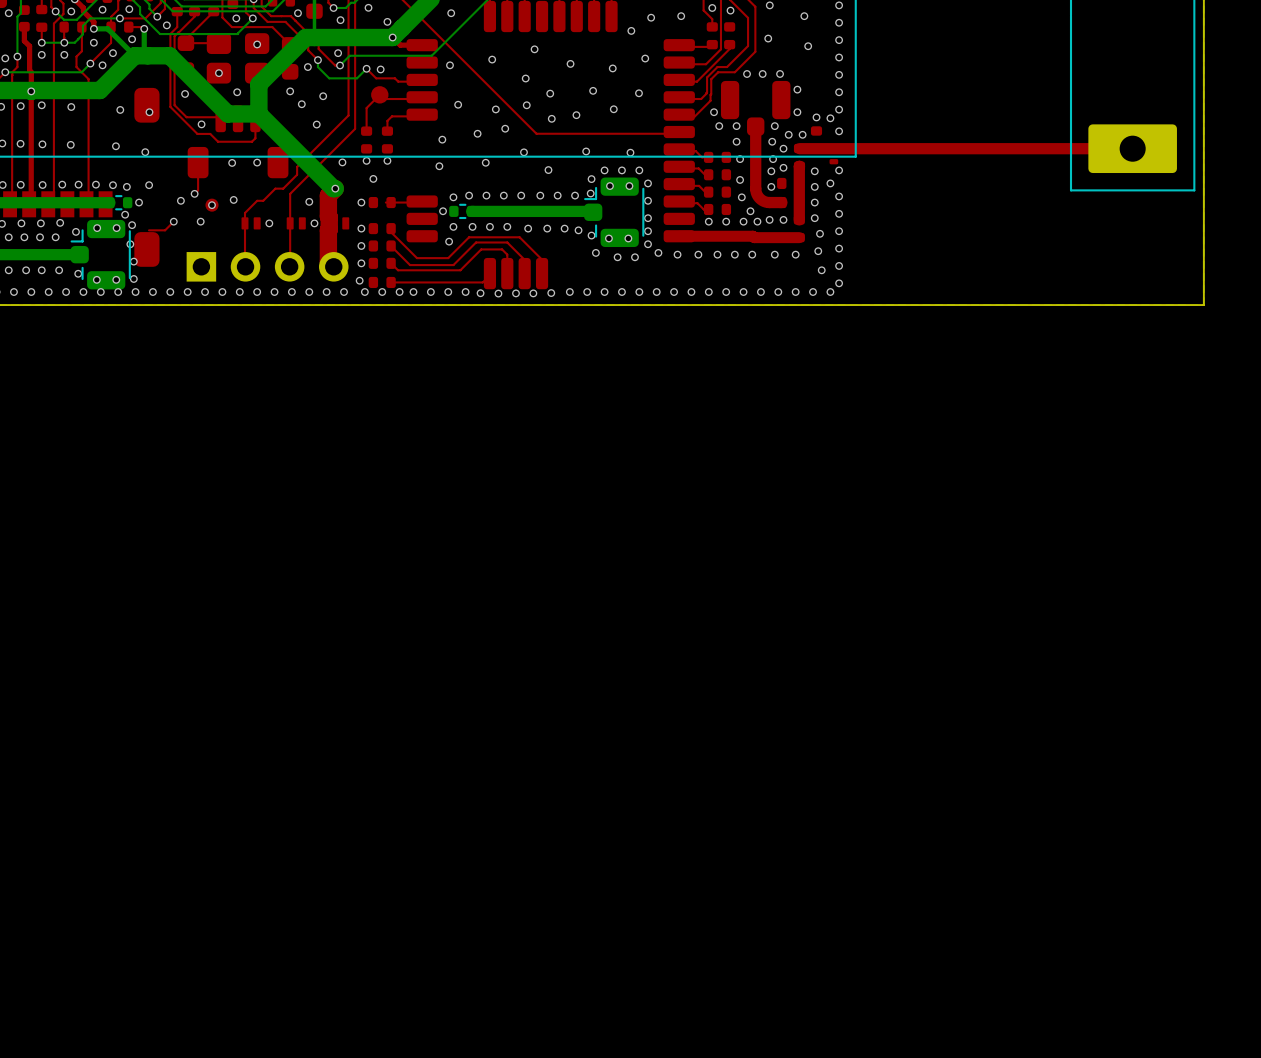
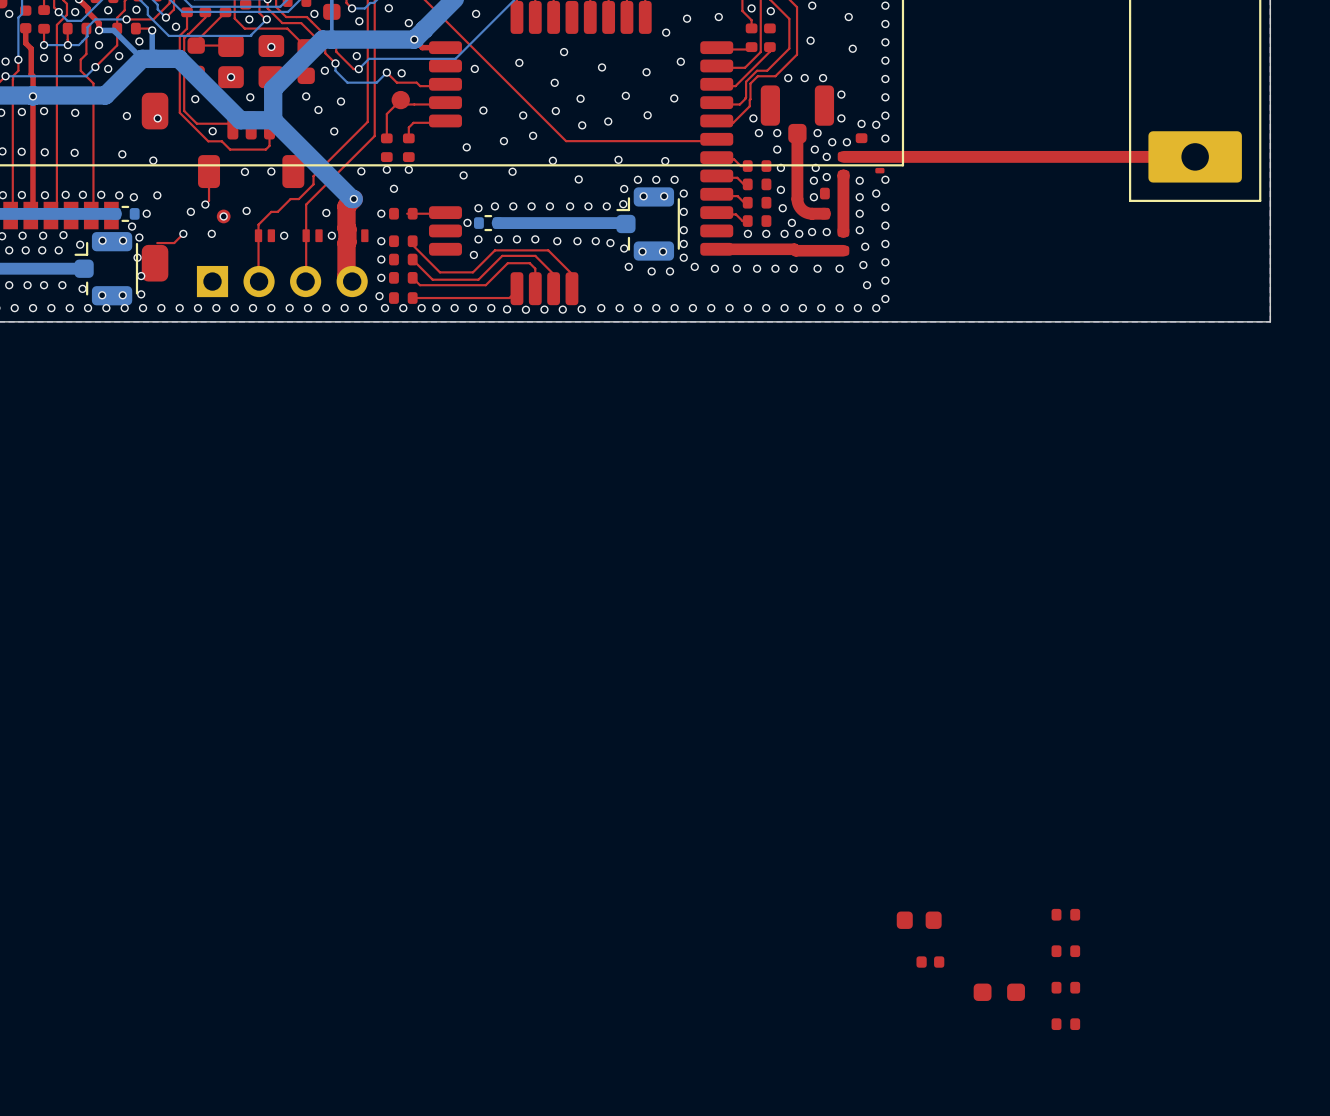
part: none -> (1065, 914)
part: none -> (919, 920)
part: none -> (1065, 951)
part: none -> (930, 962)
part: none -> (1065, 987)
part: none -> (999, 992)
part: none -> (1065, 1024)

